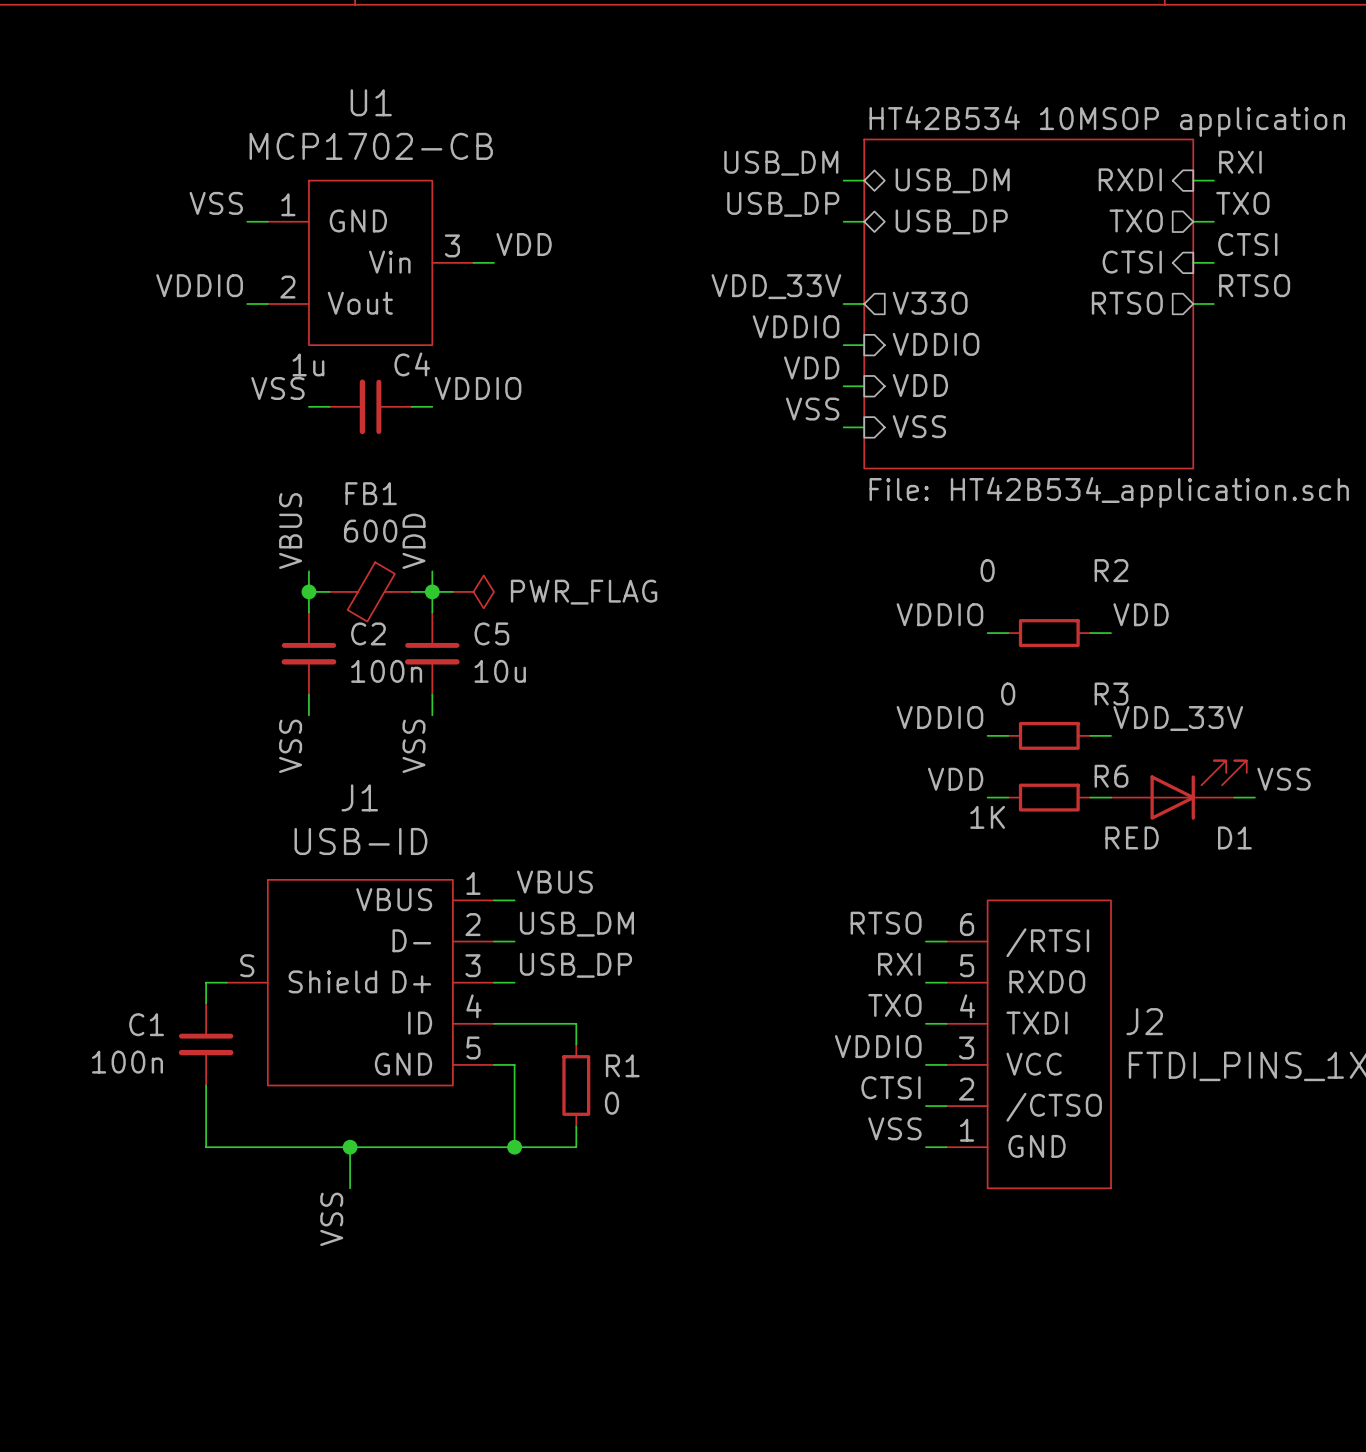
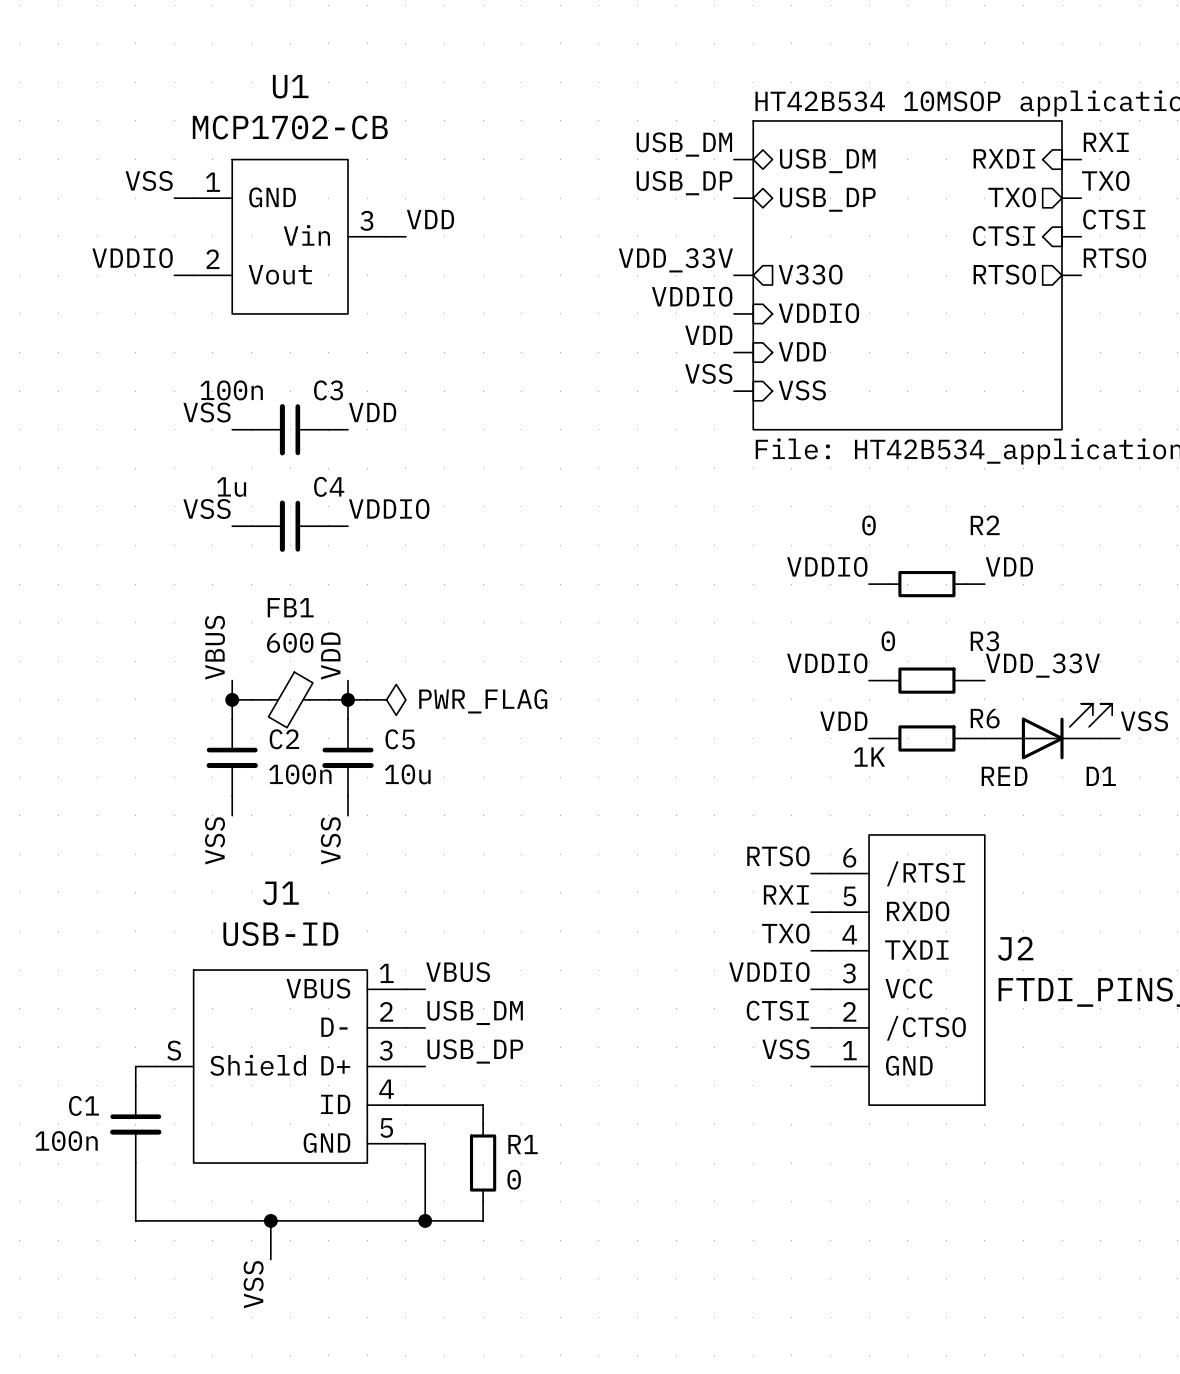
label position: VSS (277, 388) -> VSS (207, 412)
label position: VDDIO (478, 388) -> VDDIO (389, 508)
wire: (308, 406) (329, 406) -> (232, 429) (251, 429)
C4 position: (370, 406) -> (290, 526)
wire: (411, 406) (432, 406) -> (328, 429) (348, 429)
label: none -> VDD (372, 412)
C3: none -> 100n (290, 429)
label: VBUS (290, 531) -> VSS (207, 508)
label: VDD (413, 541) -> none
wire: (308, 571) (308, 612) -> (232, 526) (251, 526)
wire: (432, 571) (432, 612) -> (348, 526) (328, 526)
wire: (308, 591) (329, 591) -> (232, 699) (251, 699)
junction: (308, 591) -> none
FB1 position: (370, 591) -> (290, 699)
wire: (411, 591) (452, 591) -> (328, 699) (367, 699)
junction: (432, 591) -> none
power symbol position: PWR_FLAG (473, 591) -> PWR_FLAG (386, 699)
C2 position: (308, 653) -> (232, 757)
C5 position: (432, 653) -> (348, 757)
wire: (308, 694) (308, 715) -> (232, 796) (232, 815)
wire: (432, 694) (432, 715) -> (348, 796) (348, 815)
label: none -> VBUS (215, 647)
label: none -> VDD (330, 655)
wire: none -> (232, 680) (232, 719)
wire: none -> (348, 680) (348, 719)
label: VSS (290, 746) -> none
label: VSS (413, 746) -> none
junction: none -> (232, 699)
junction: none -> (348, 699)
label: VBUS (554, 882) -> none
wire: (494, 900) (514, 900) -> none
label: none -> VSS (215, 840)
label: none -> VSS (330, 840)
label position: USB_DM (576, 924) -> USB_DM (475, 1012)
wire: (494, 941) (514, 941) -> (405, 1027) (425, 1027)
label position: USB_DP (575, 965) -> USB_DP (475, 1051)
wire: (226, 982) (206, 982) (206, 1003) -> none
J1 position: (360, 982) -> (280, 1066)
wire: (494, 982) (514, 982) -> none
wire: (494, 1023) (576, 1023) (576, 1044) -> (405, 1105) (483, 1105) (483, 1124)
C1 position: (206, 1044) -> (135, 1124)
label: none -> VBUS (458, 972)
wire: (514, 1064) (514, 1147) (576, 1147) (576, 1126) -> none
wire: (206, 1085) (206, 1147) -> (135, 1085) (135, 1066)
R1 position: (576, 1085) -> (483, 1163)
wire: (226, 1147) (494, 1147) -> none
wire: (350, 1147) (350, 1188) -> (270, 1220) (270, 1259)
junction: (350, 1147) -> none
junction: (514, 1147) -> none
label: VSS (331, 1219) -> none
wire: none -> (405, 1143) (425, 1143) (425, 1220)
wire: none -> (135, 1163) (135, 1220) (483, 1220) (483, 1201)
junction: none -> (270, 1220)
junction: none -> (425, 1220)
label: none -> VSS (253, 1284)

